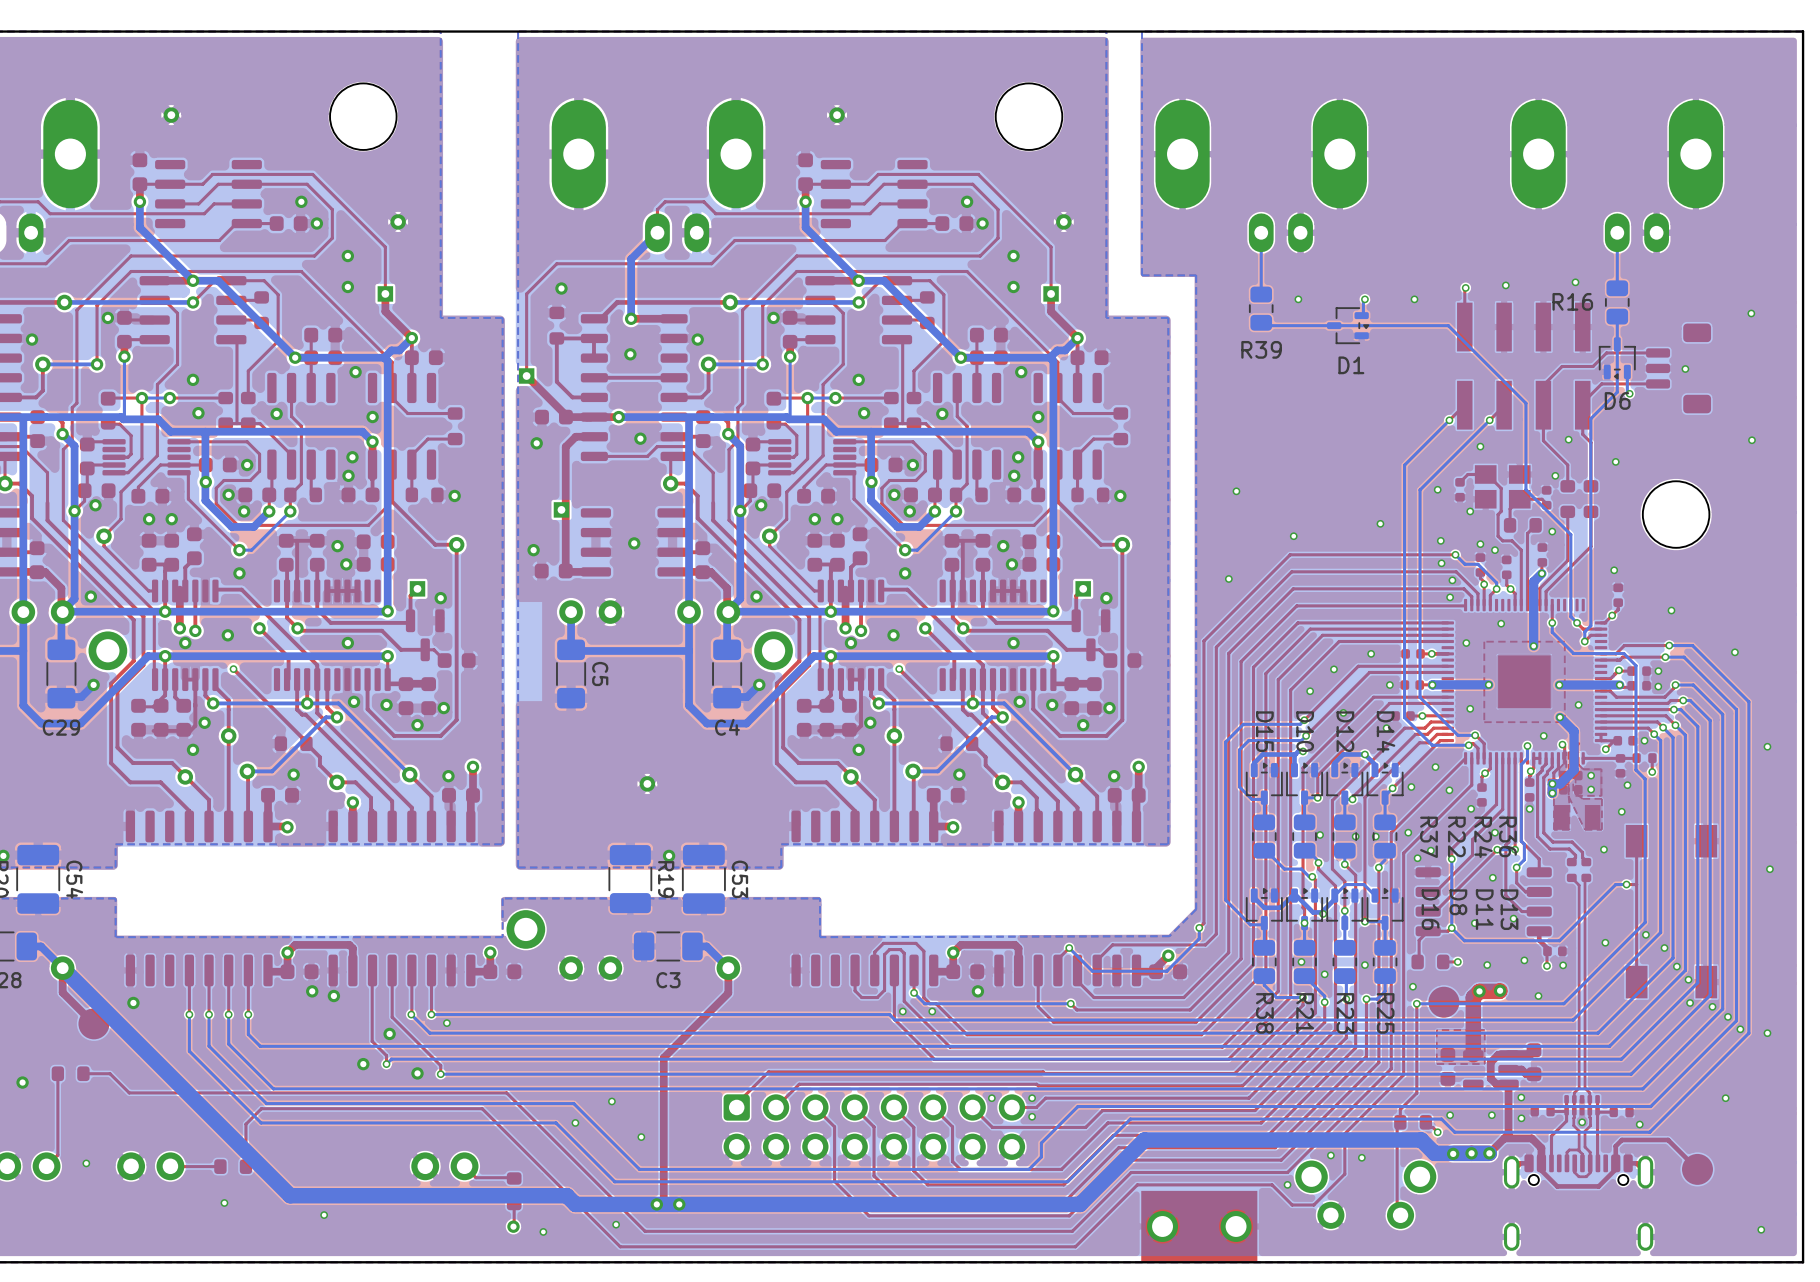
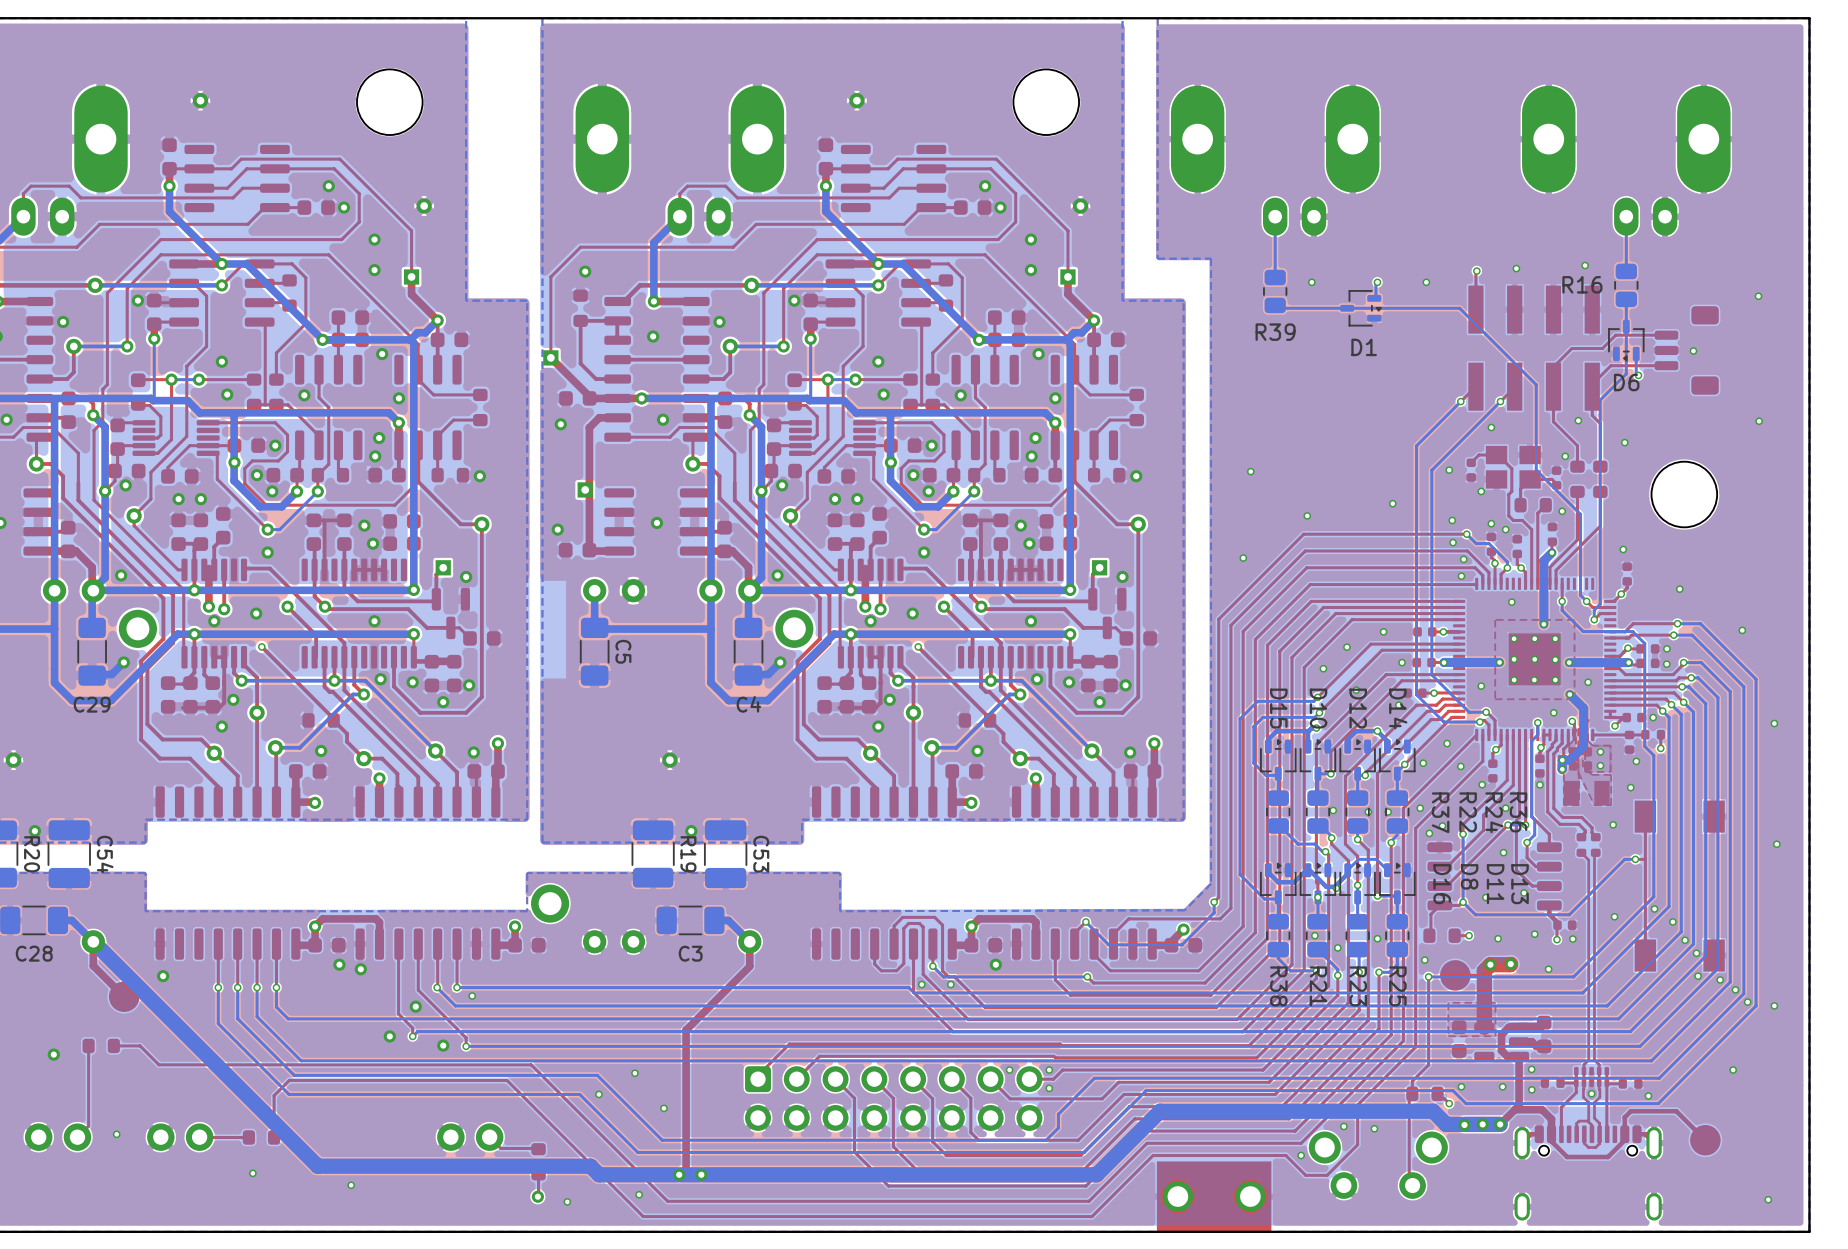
via: (1466, 643) -> none
via: none -> (1514, 638)
via: none -> (1534, 638)
via: none -> (1555, 638)
via: none -> (1514, 659)
via: none -> (1534, 659)
via: none -> (1555, 659)
via: none -> (1514, 679)
via: none -> (1534, 679)
via: none -> (1555, 679)

